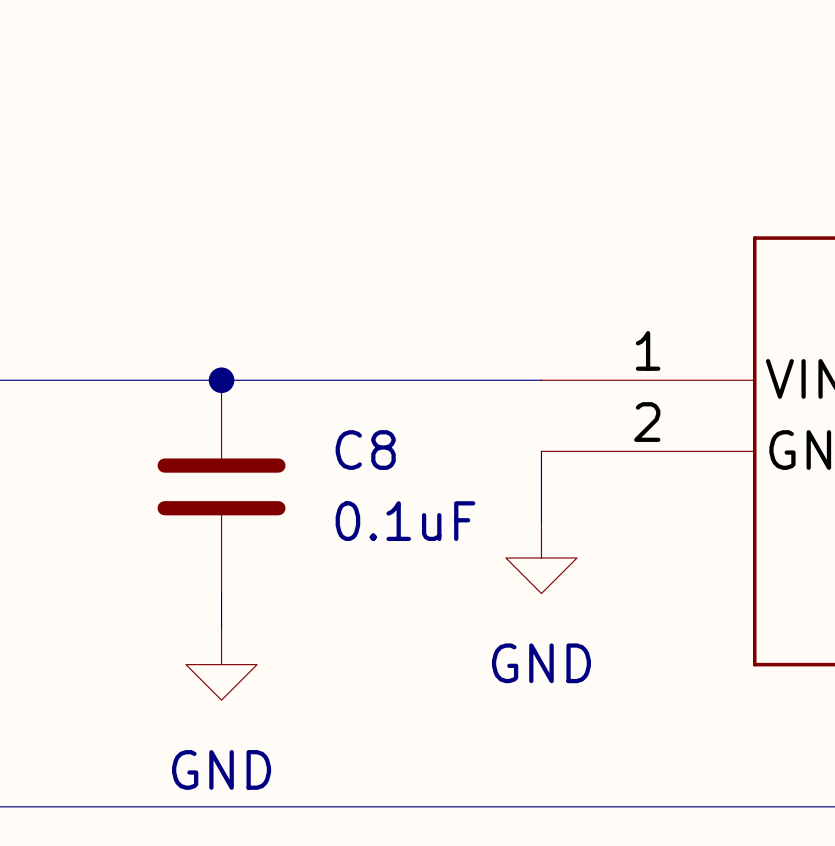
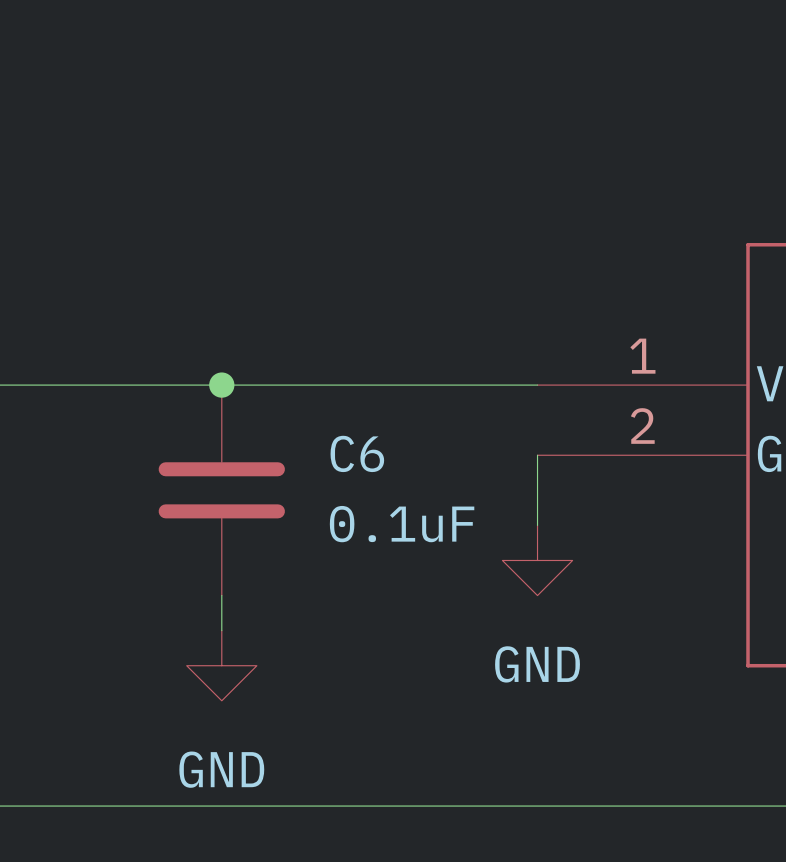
C8 name: C8 (365, 450) -> C6 (357, 453)

